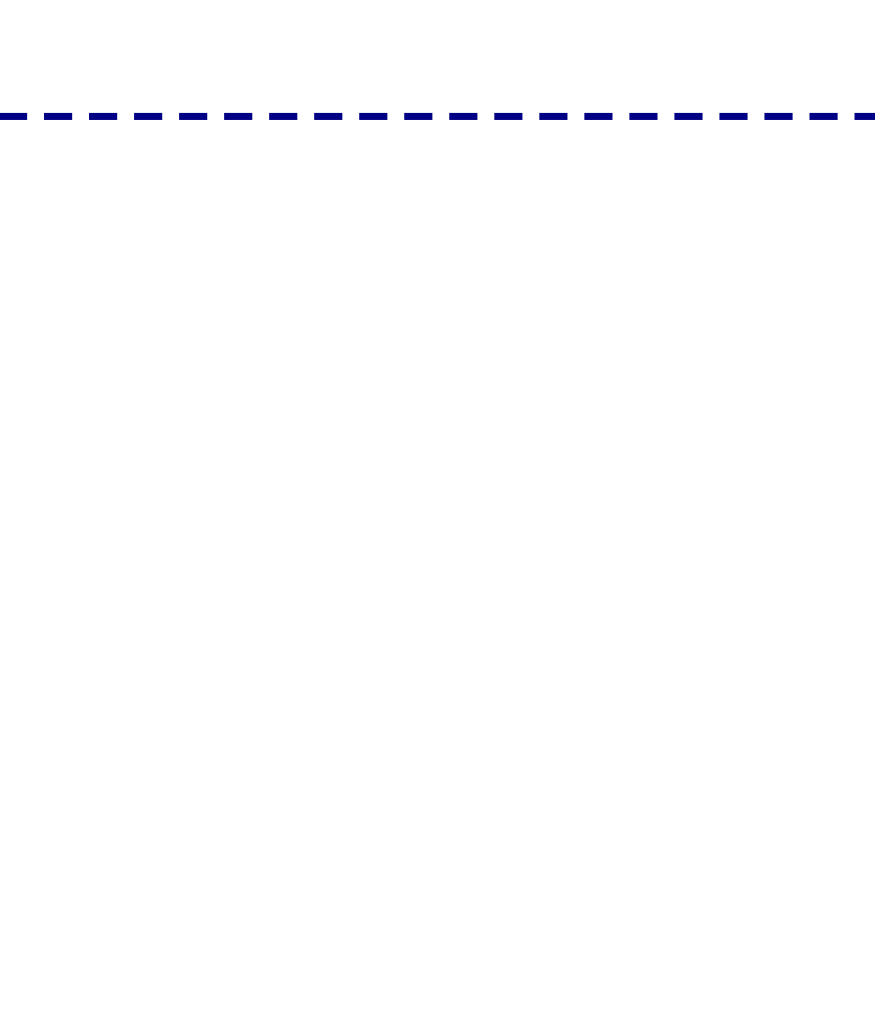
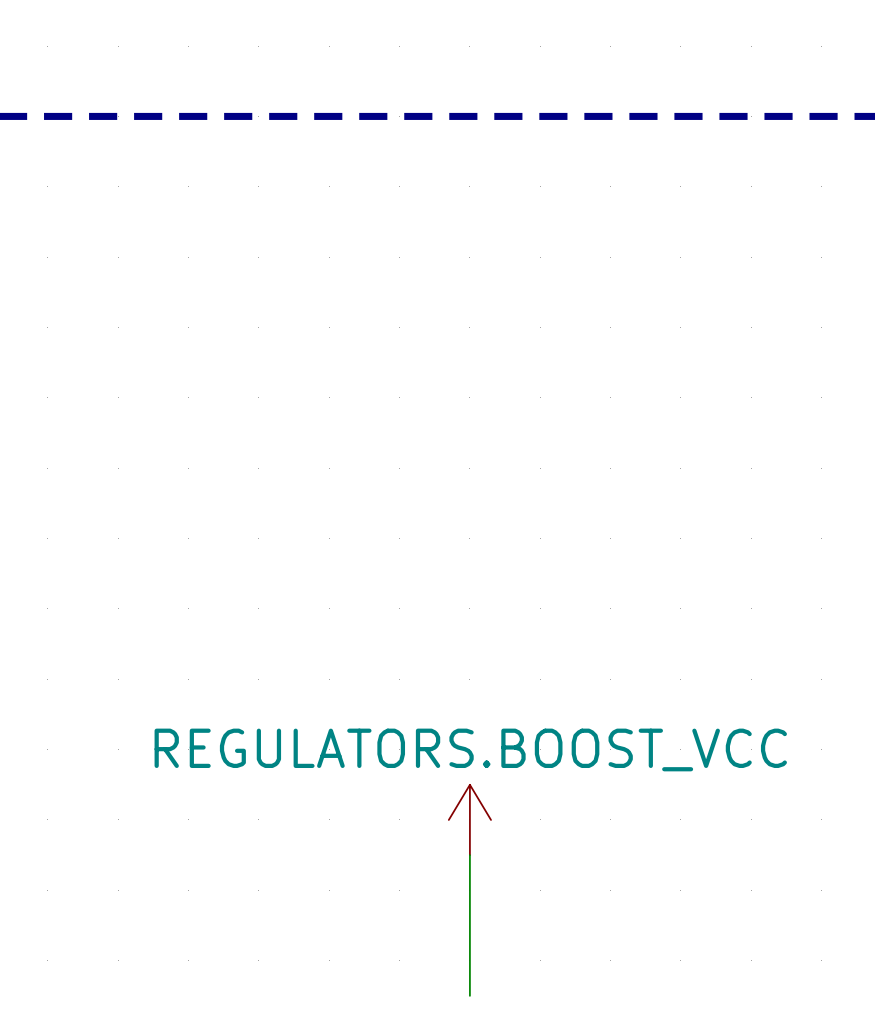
power symbol: none -> REGULATORS.BOOST_VCC (469, 819)
wire: none -> (469, 855) (469, 995)

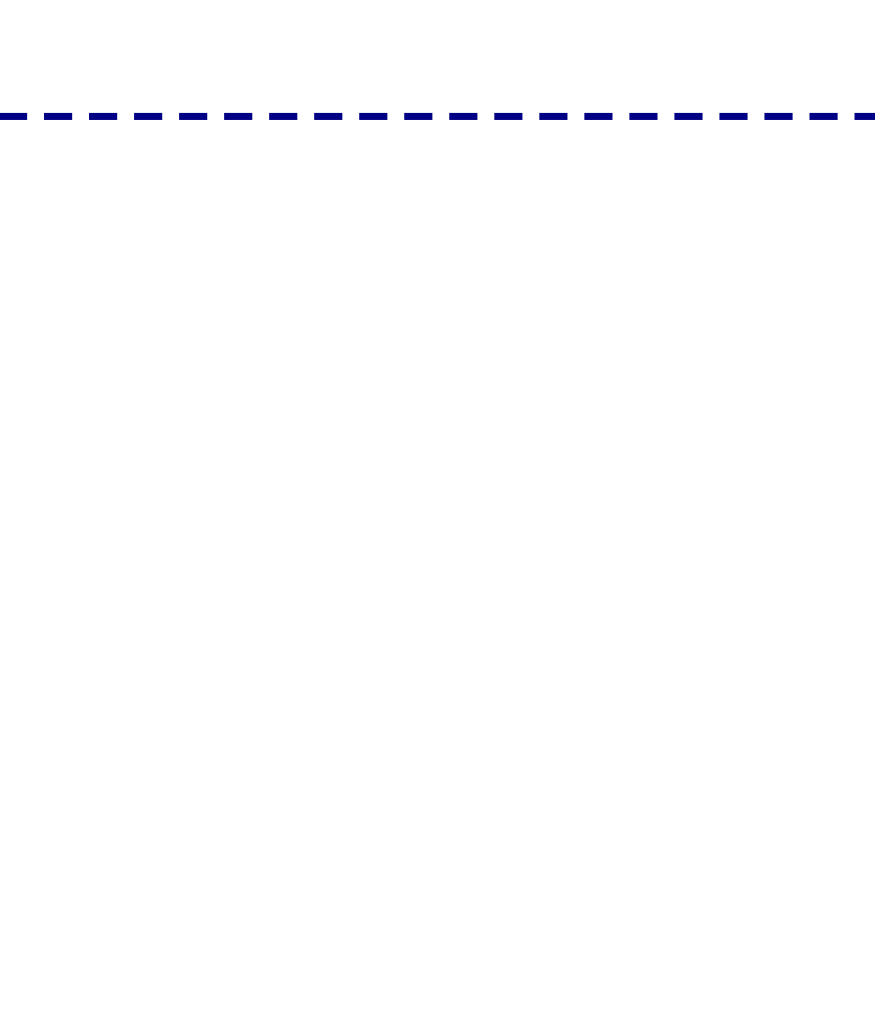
power symbol: REGULATORS.BOOST_VCC (469, 819) -> none
wire: (469, 855) (469, 995) -> none

